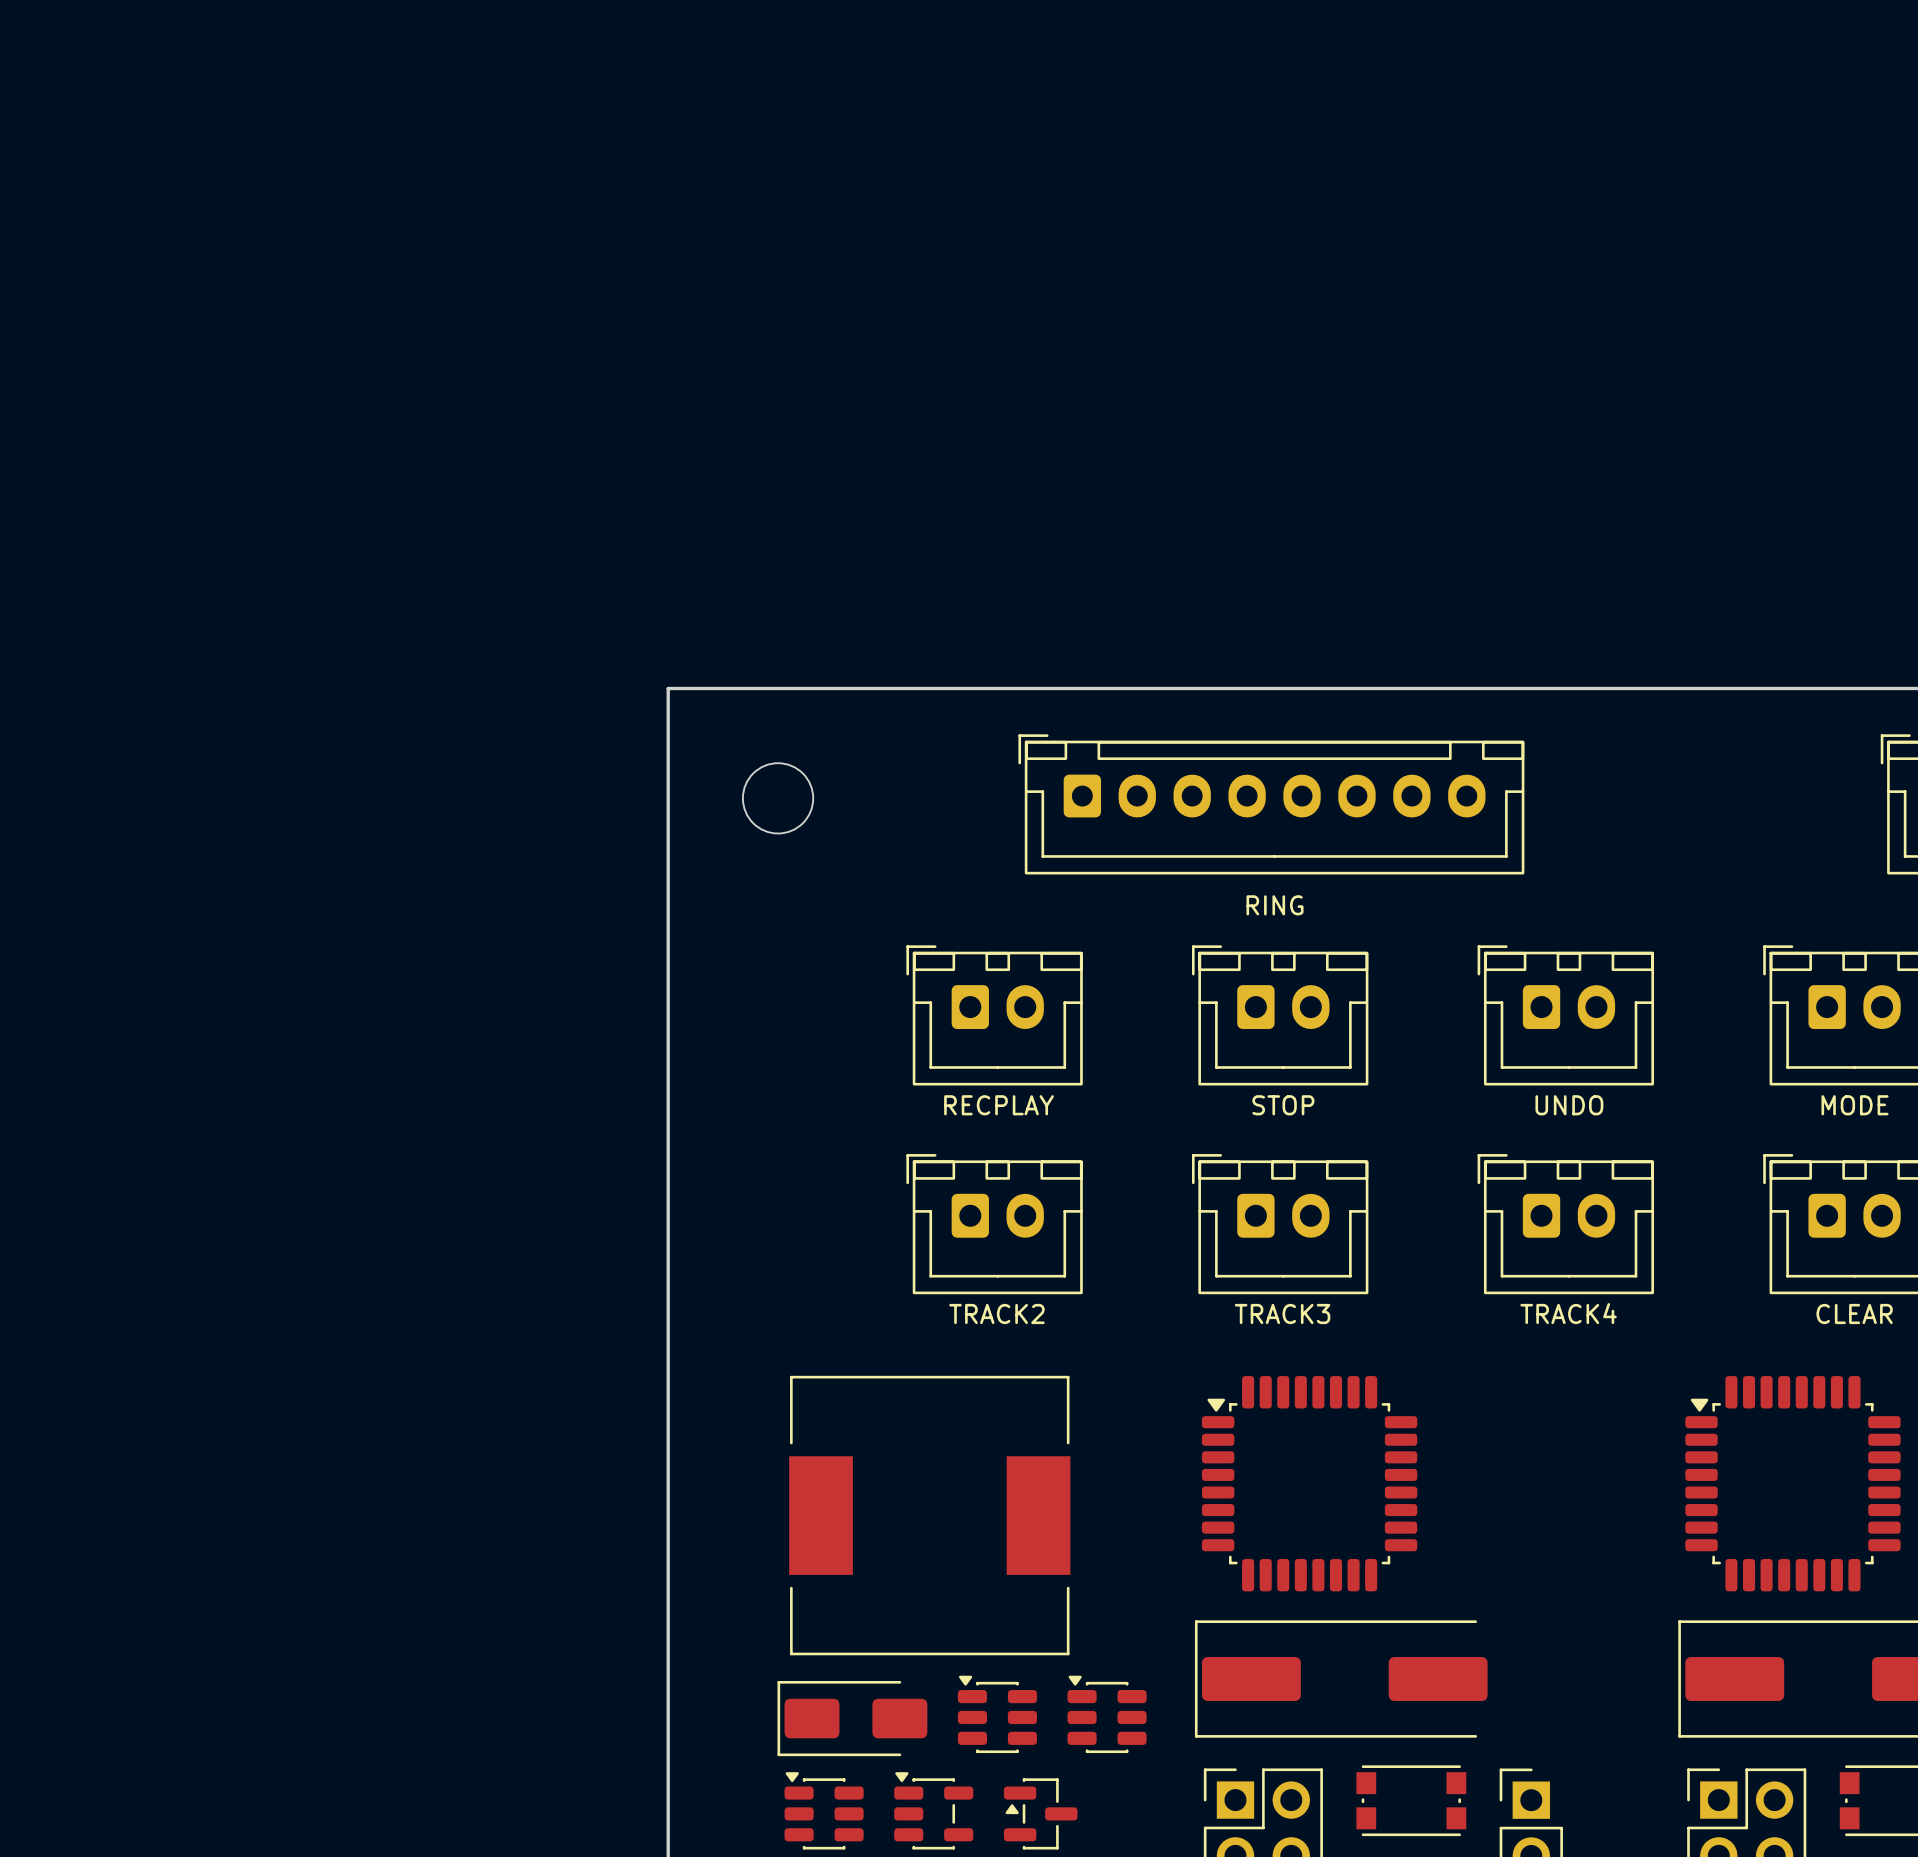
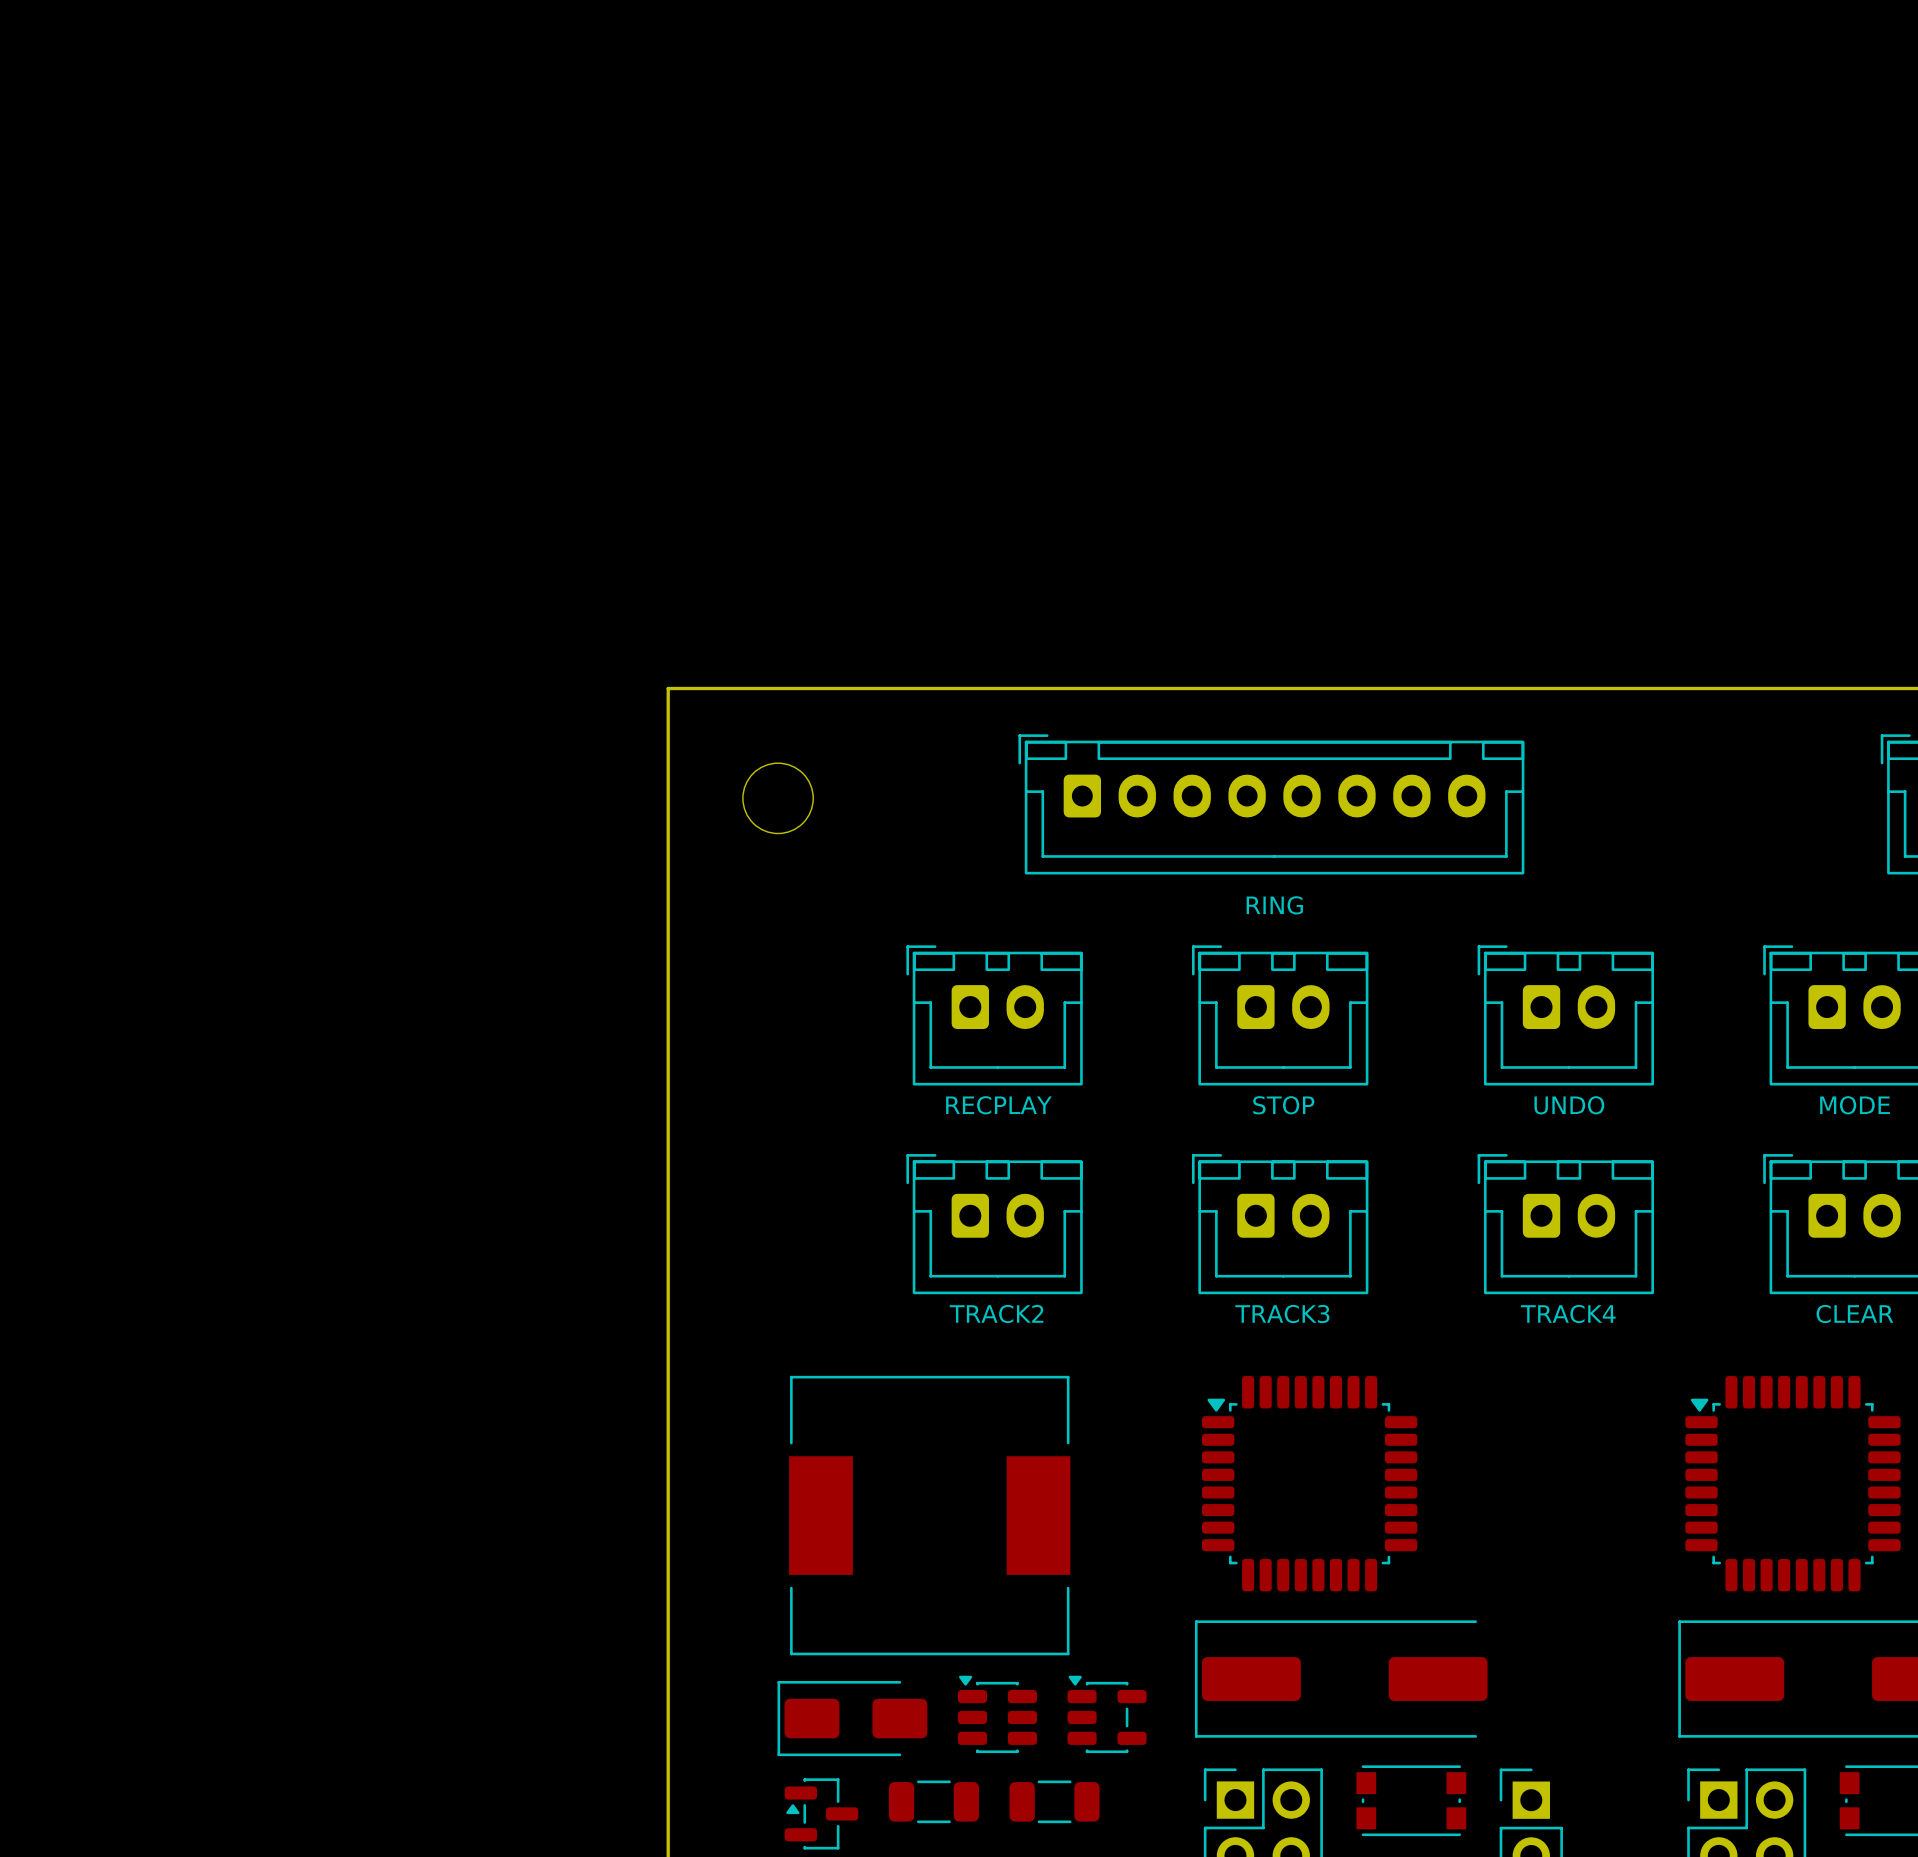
part footprint: [1067, 1675, 1147, 1754] -> [1067, 1675, 1147, 1754]
part footprint: [784, 1772, 864, 1850] -> [784, 1778, 859, 1850]
part footprint: [894, 1772, 974, 1850] -> [888, 1780, 979, 1824]
part footprint: [1003, 1778, 1078, 1850] -> [1009, 1780, 1100, 1824]

